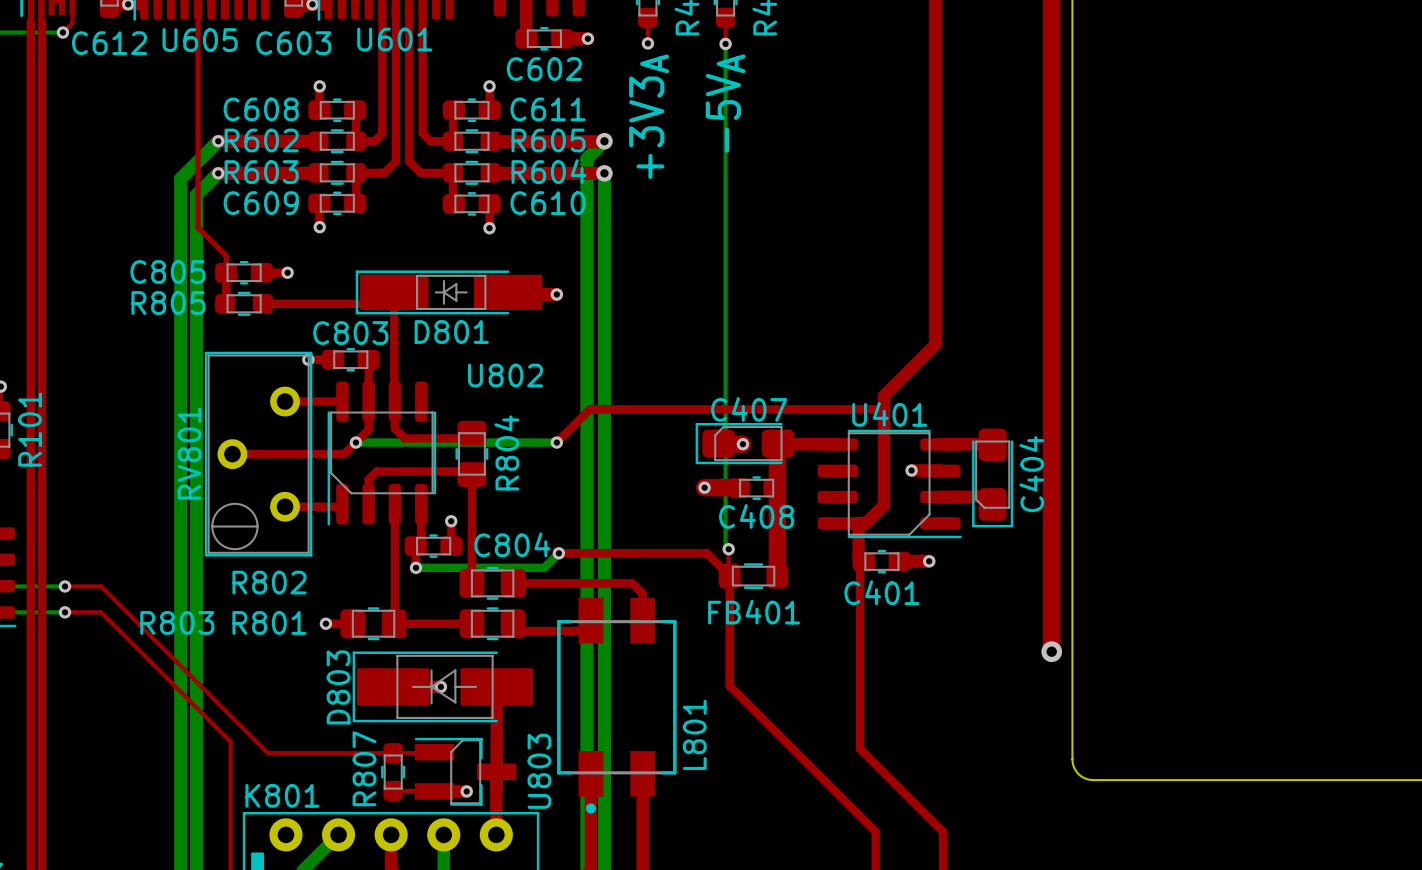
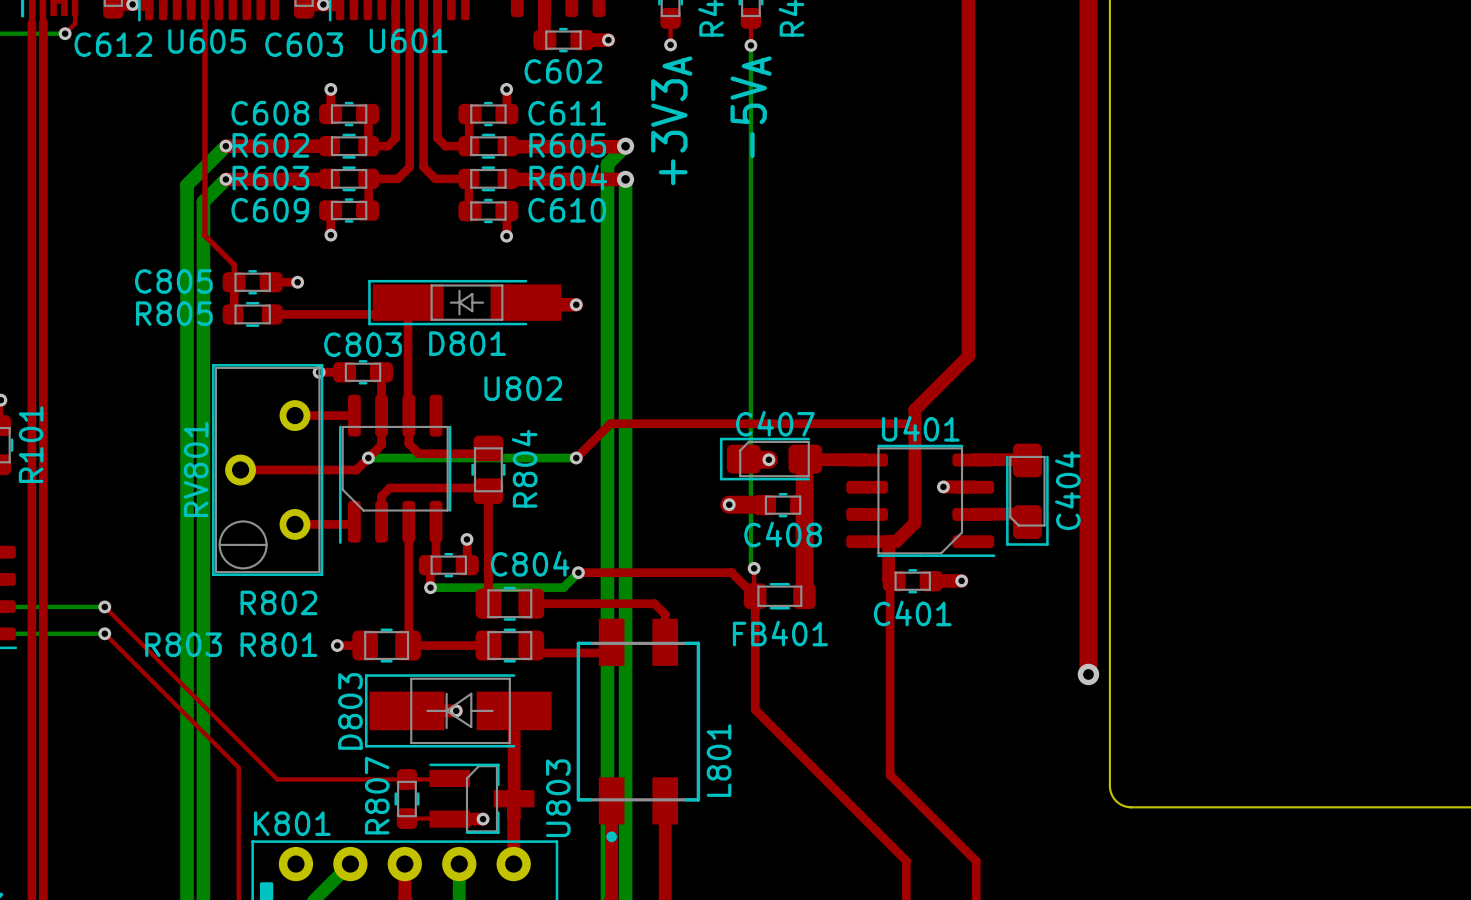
top track: (65, 586) (101, 586) -> none
bottom track: none -> (67, 606) (104, 606)
via: (65, 586) -> none
via: none -> (104, 606)
top track: (65, 612) (101, 612) -> none
bottom track: none -> (67, 633) (104, 633)
via: (65, 612) -> none
via: none -> (104, 633)

